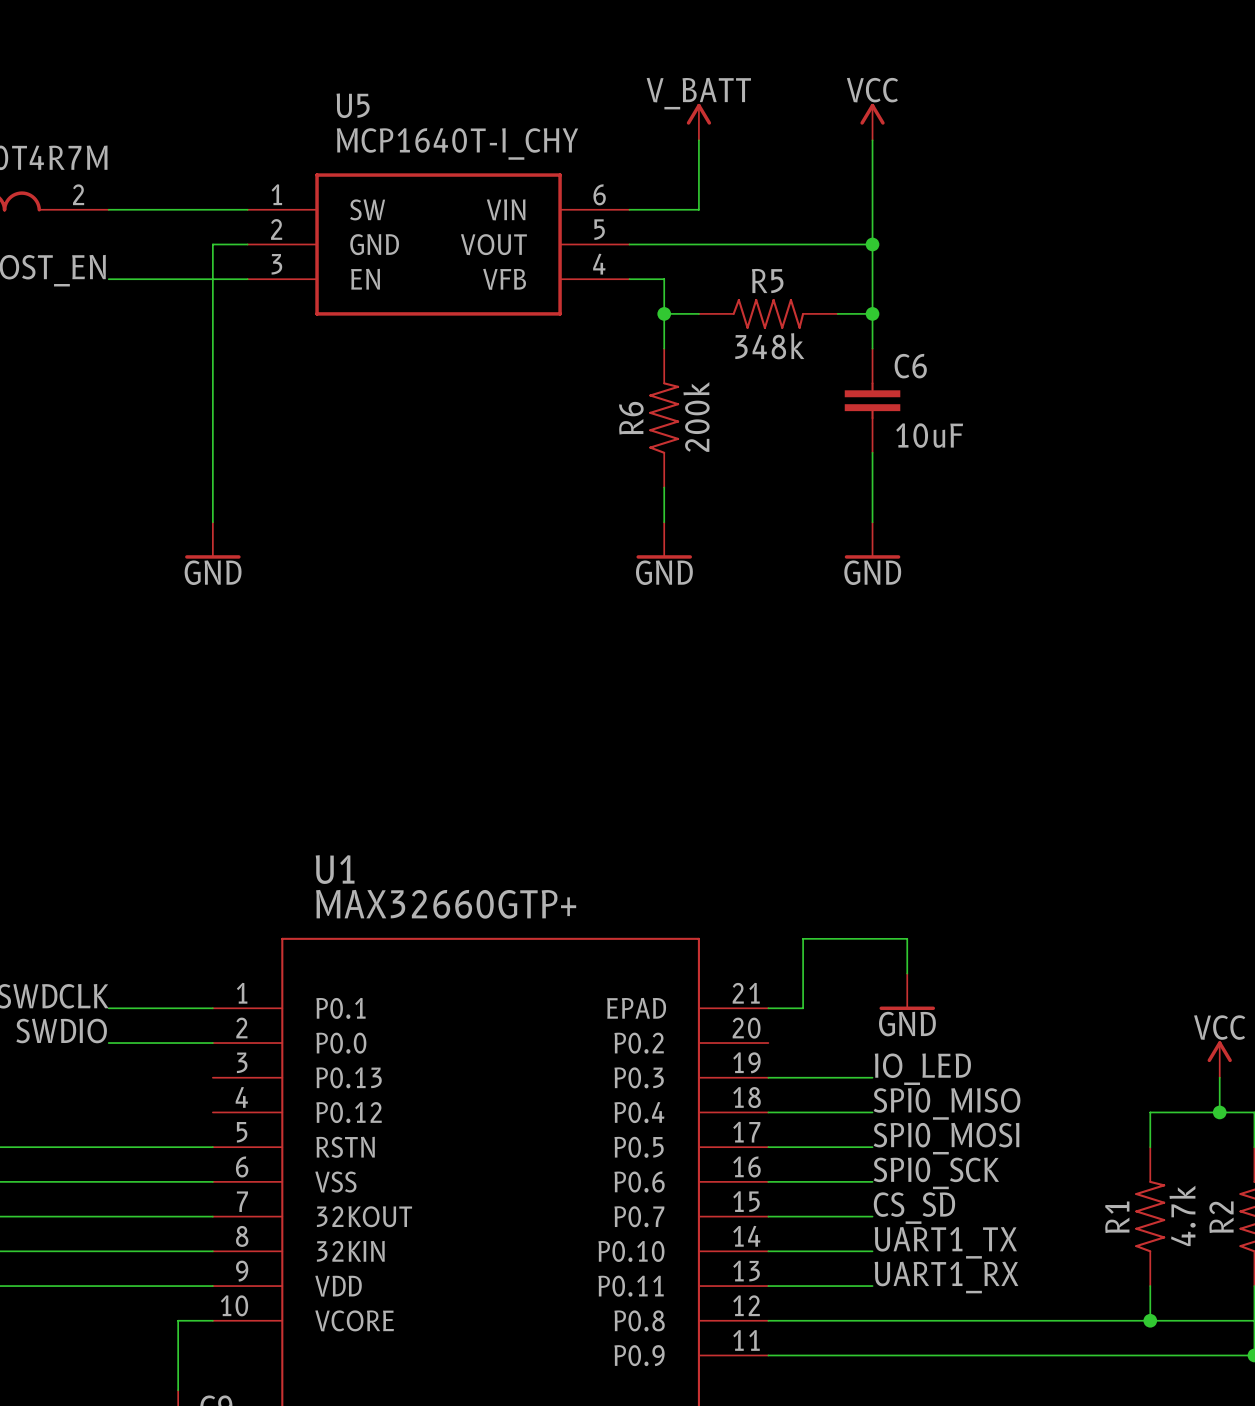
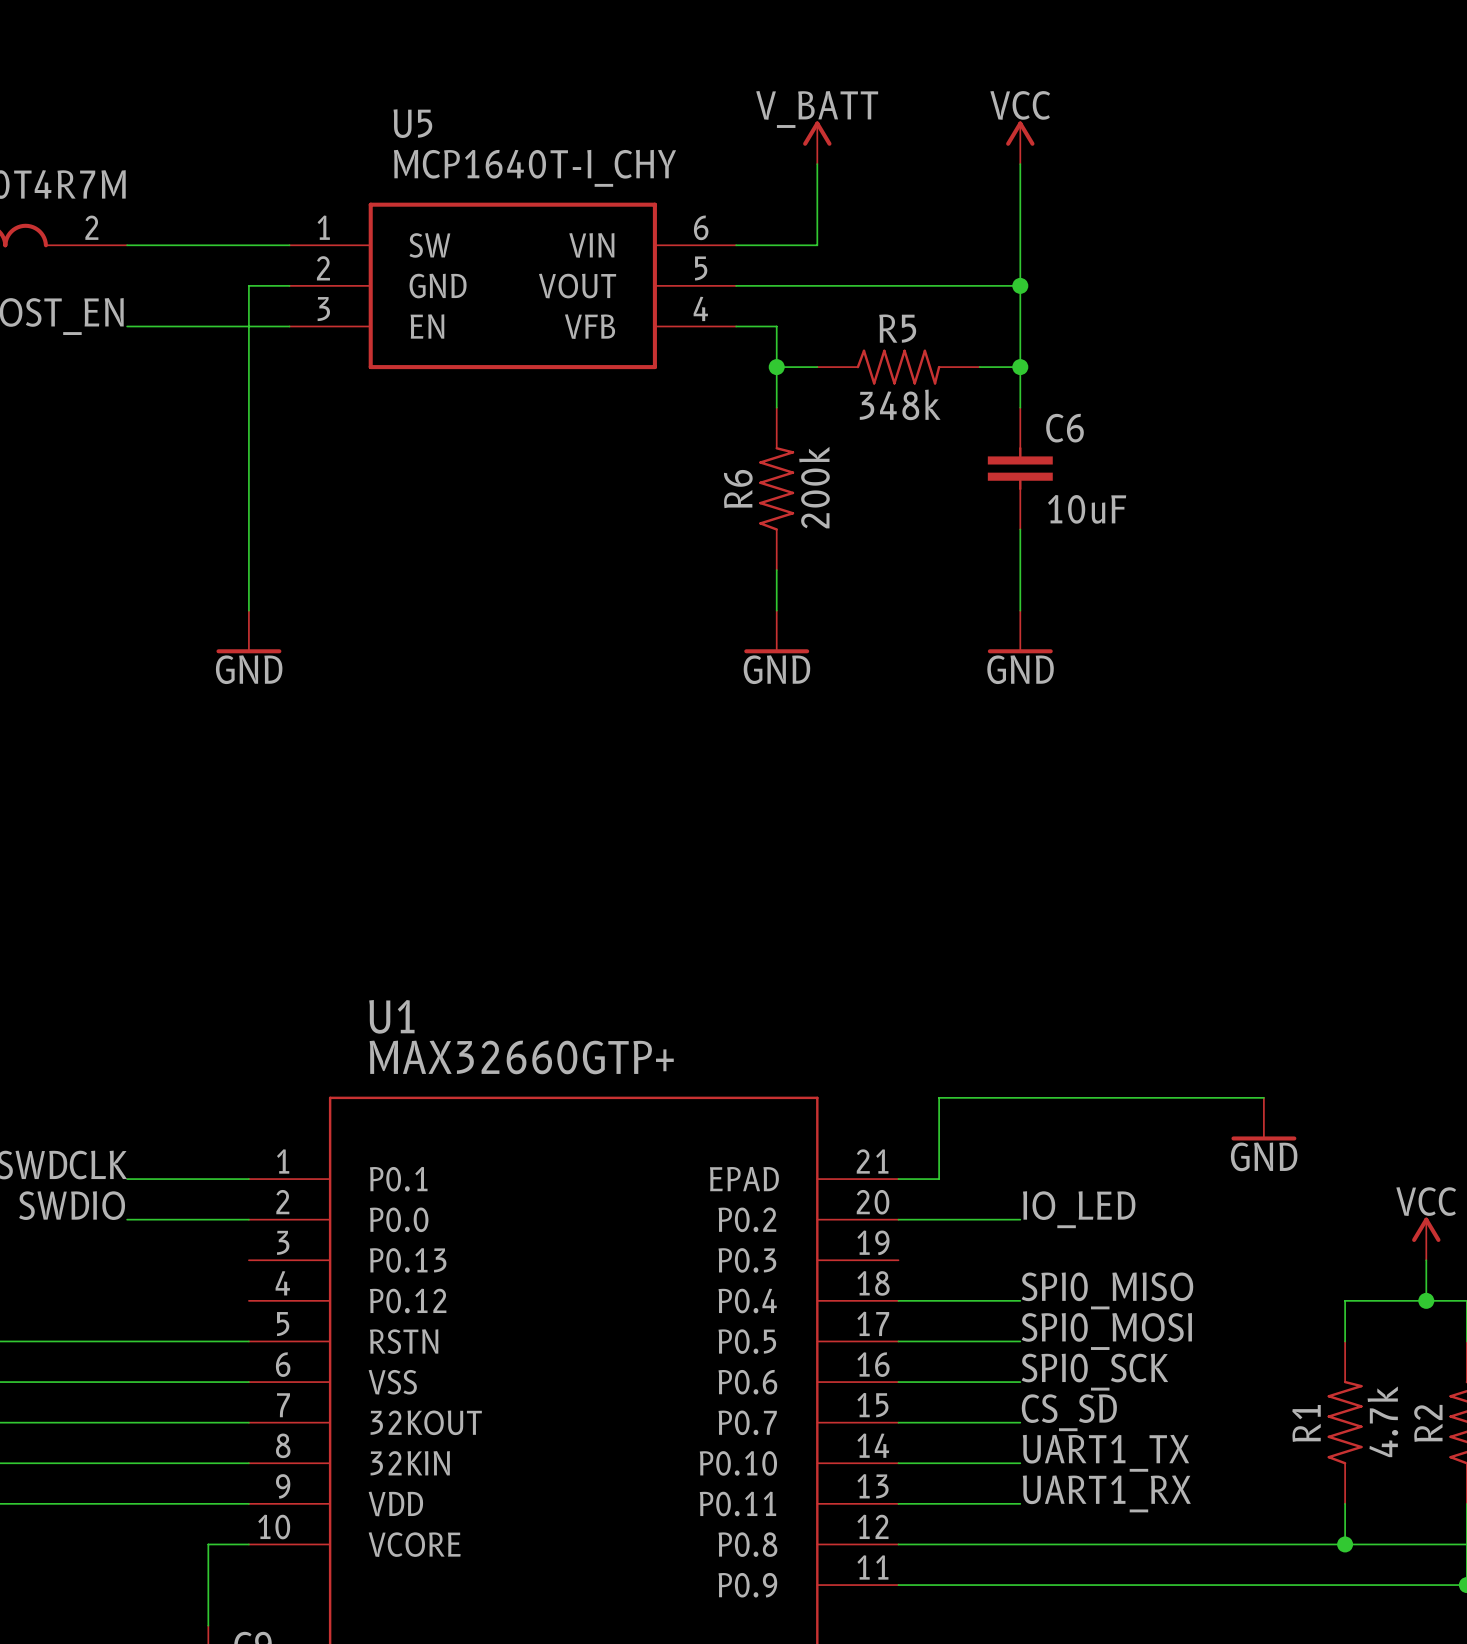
wire: (907, 938) (907, 973) -> (1060, 1097) (1263, 1097)
power symbol position: GND (907, 991) -> GND (1263, 1119)
label position: IO_LED (922, 1069) -> IO_LED (1079, 1209)
wire: (768, 1077) (872, 1077) -> (898, 1219) (1020, 1219)

